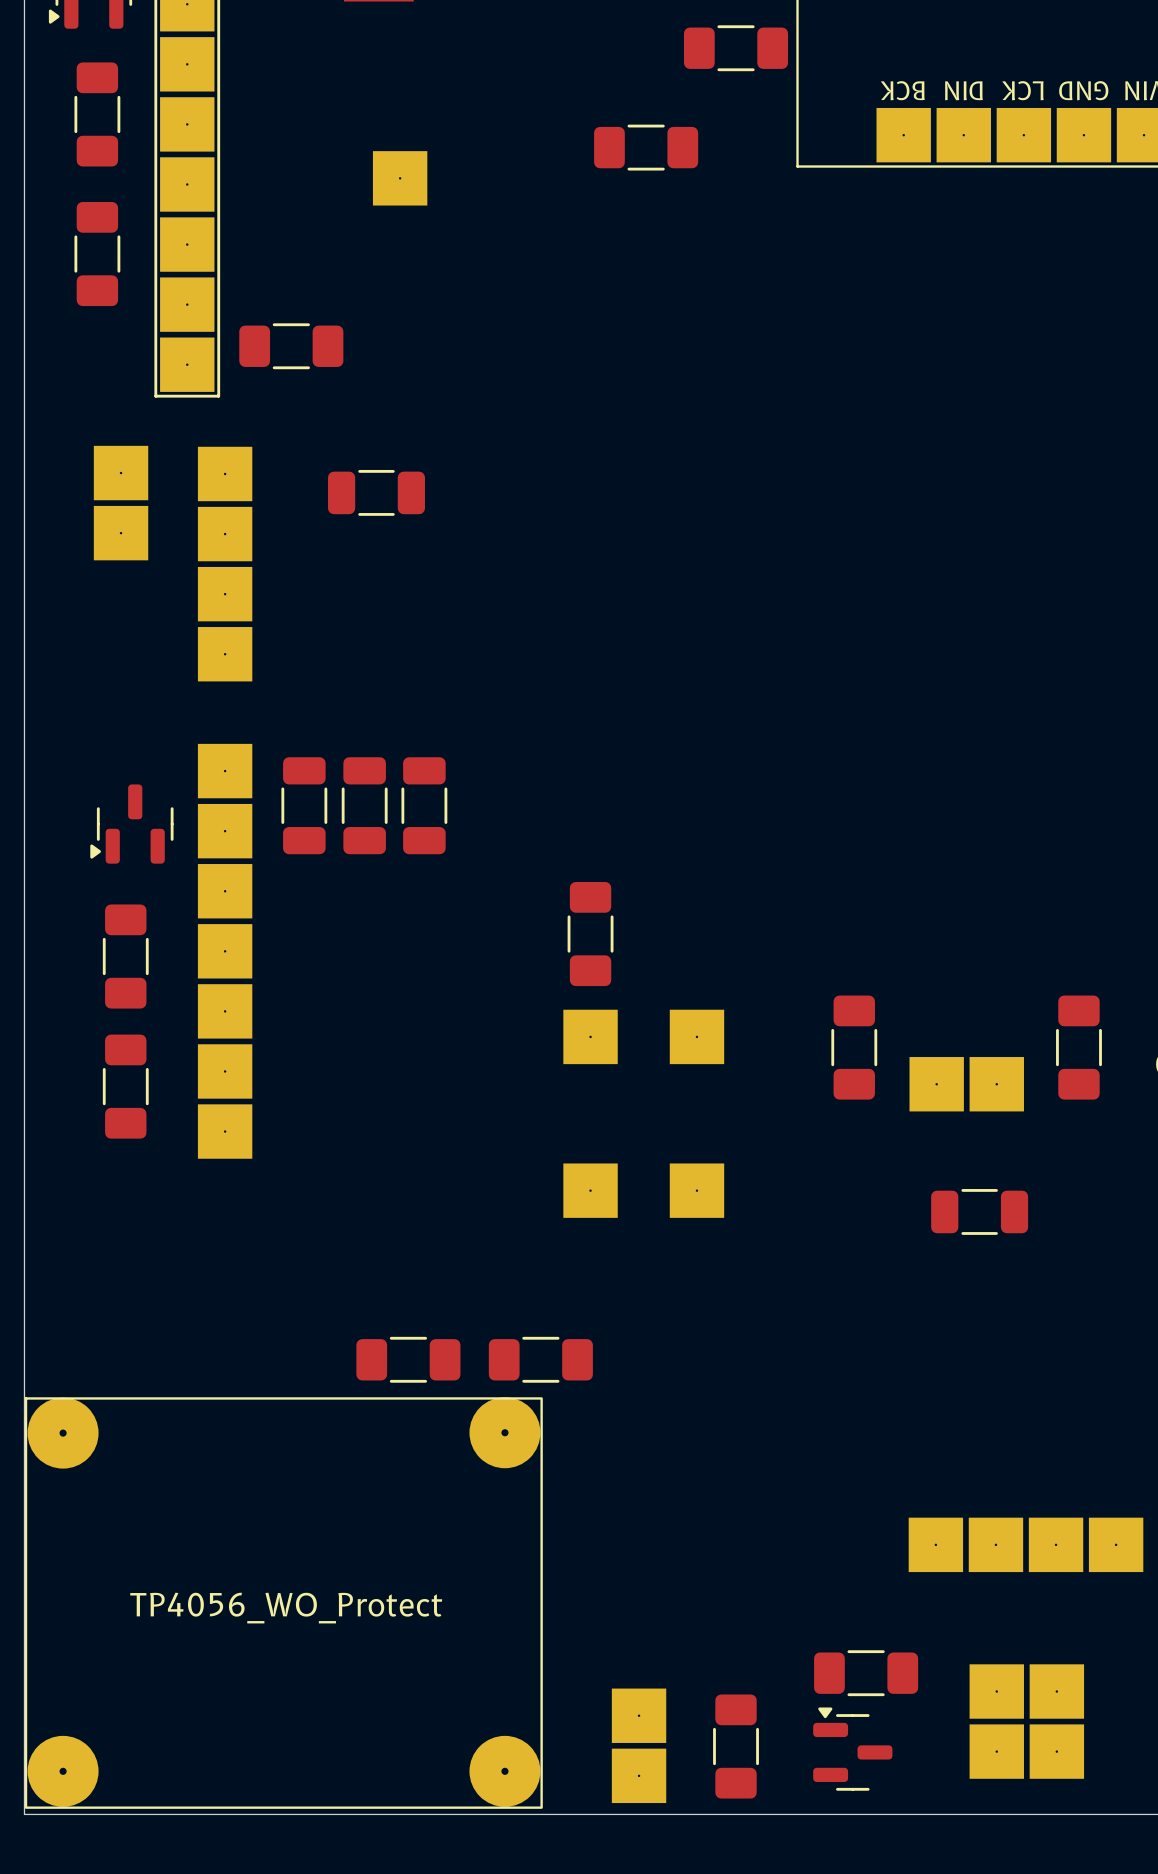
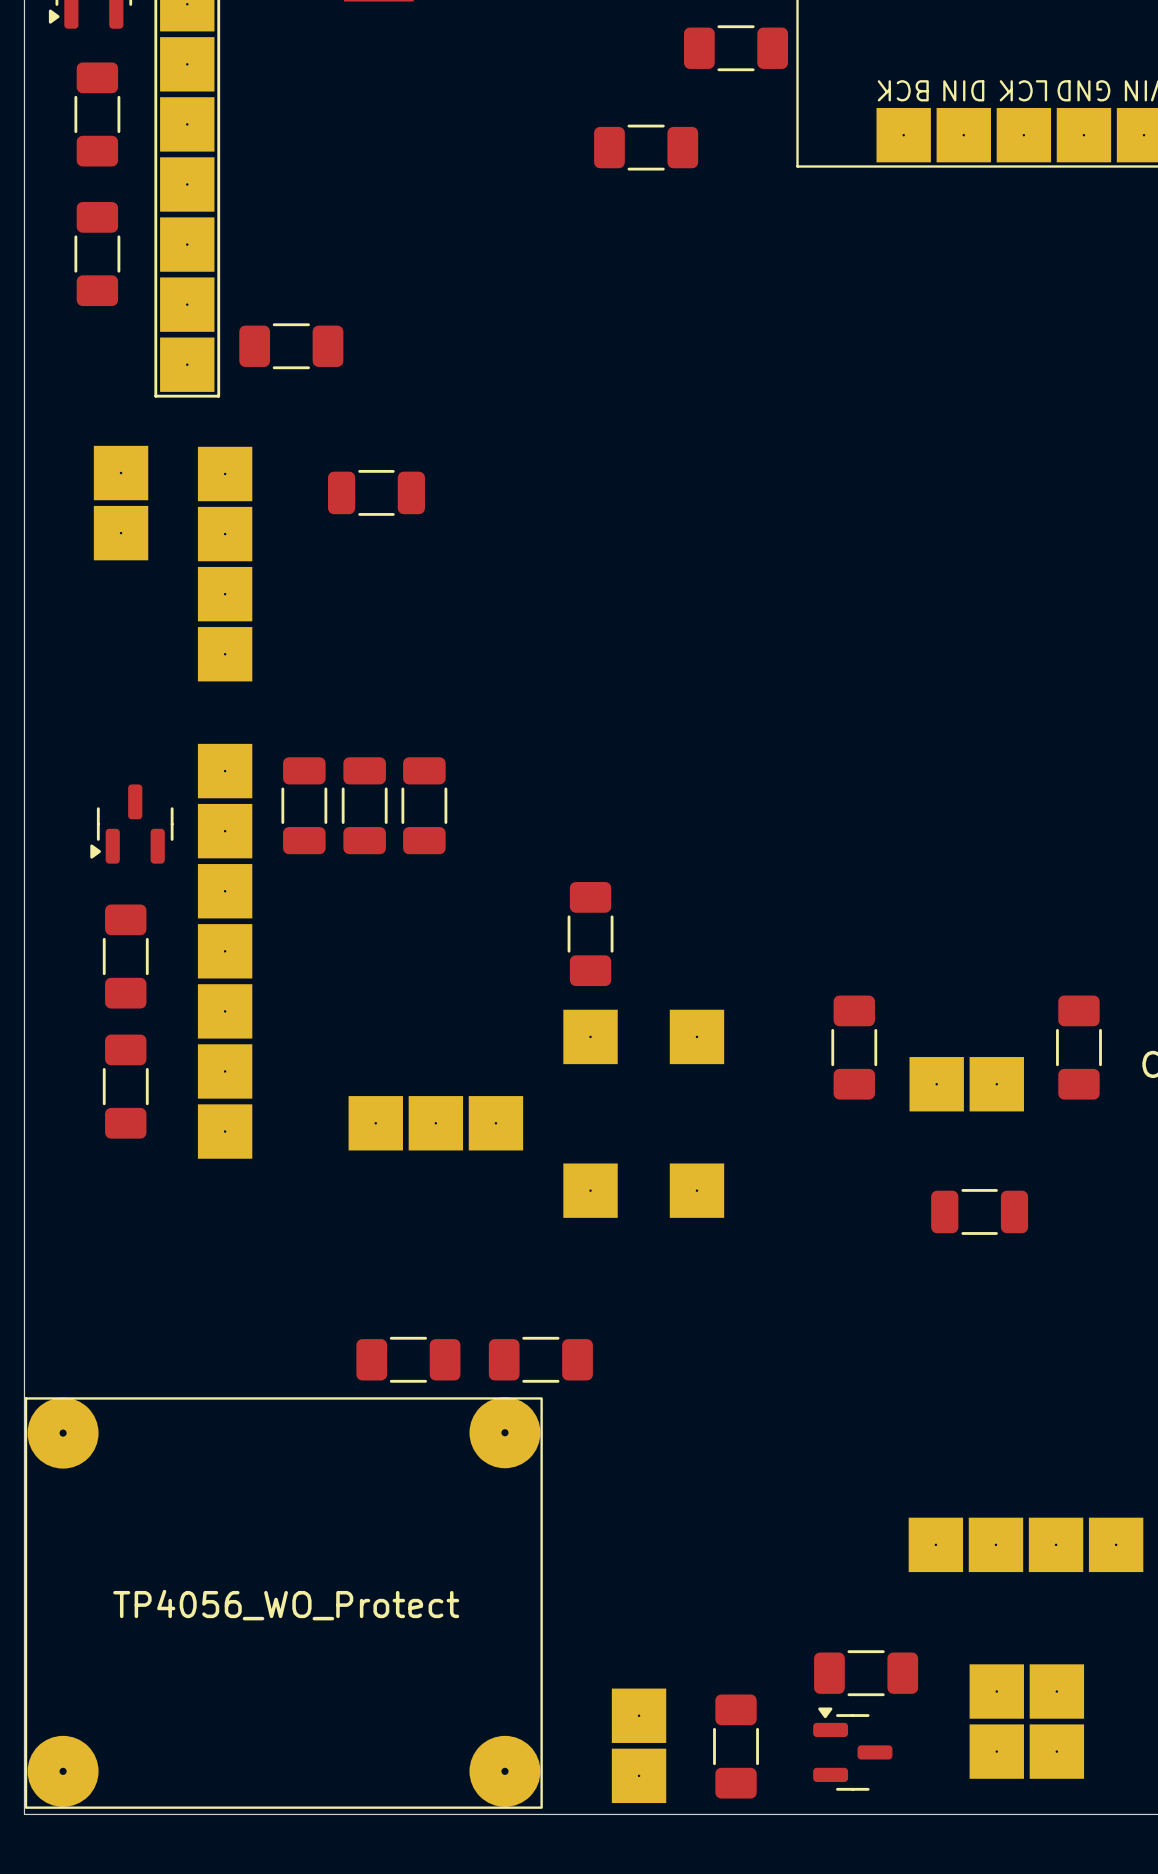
part: (400, 178) -> none
part: none -> (435, 1123)

